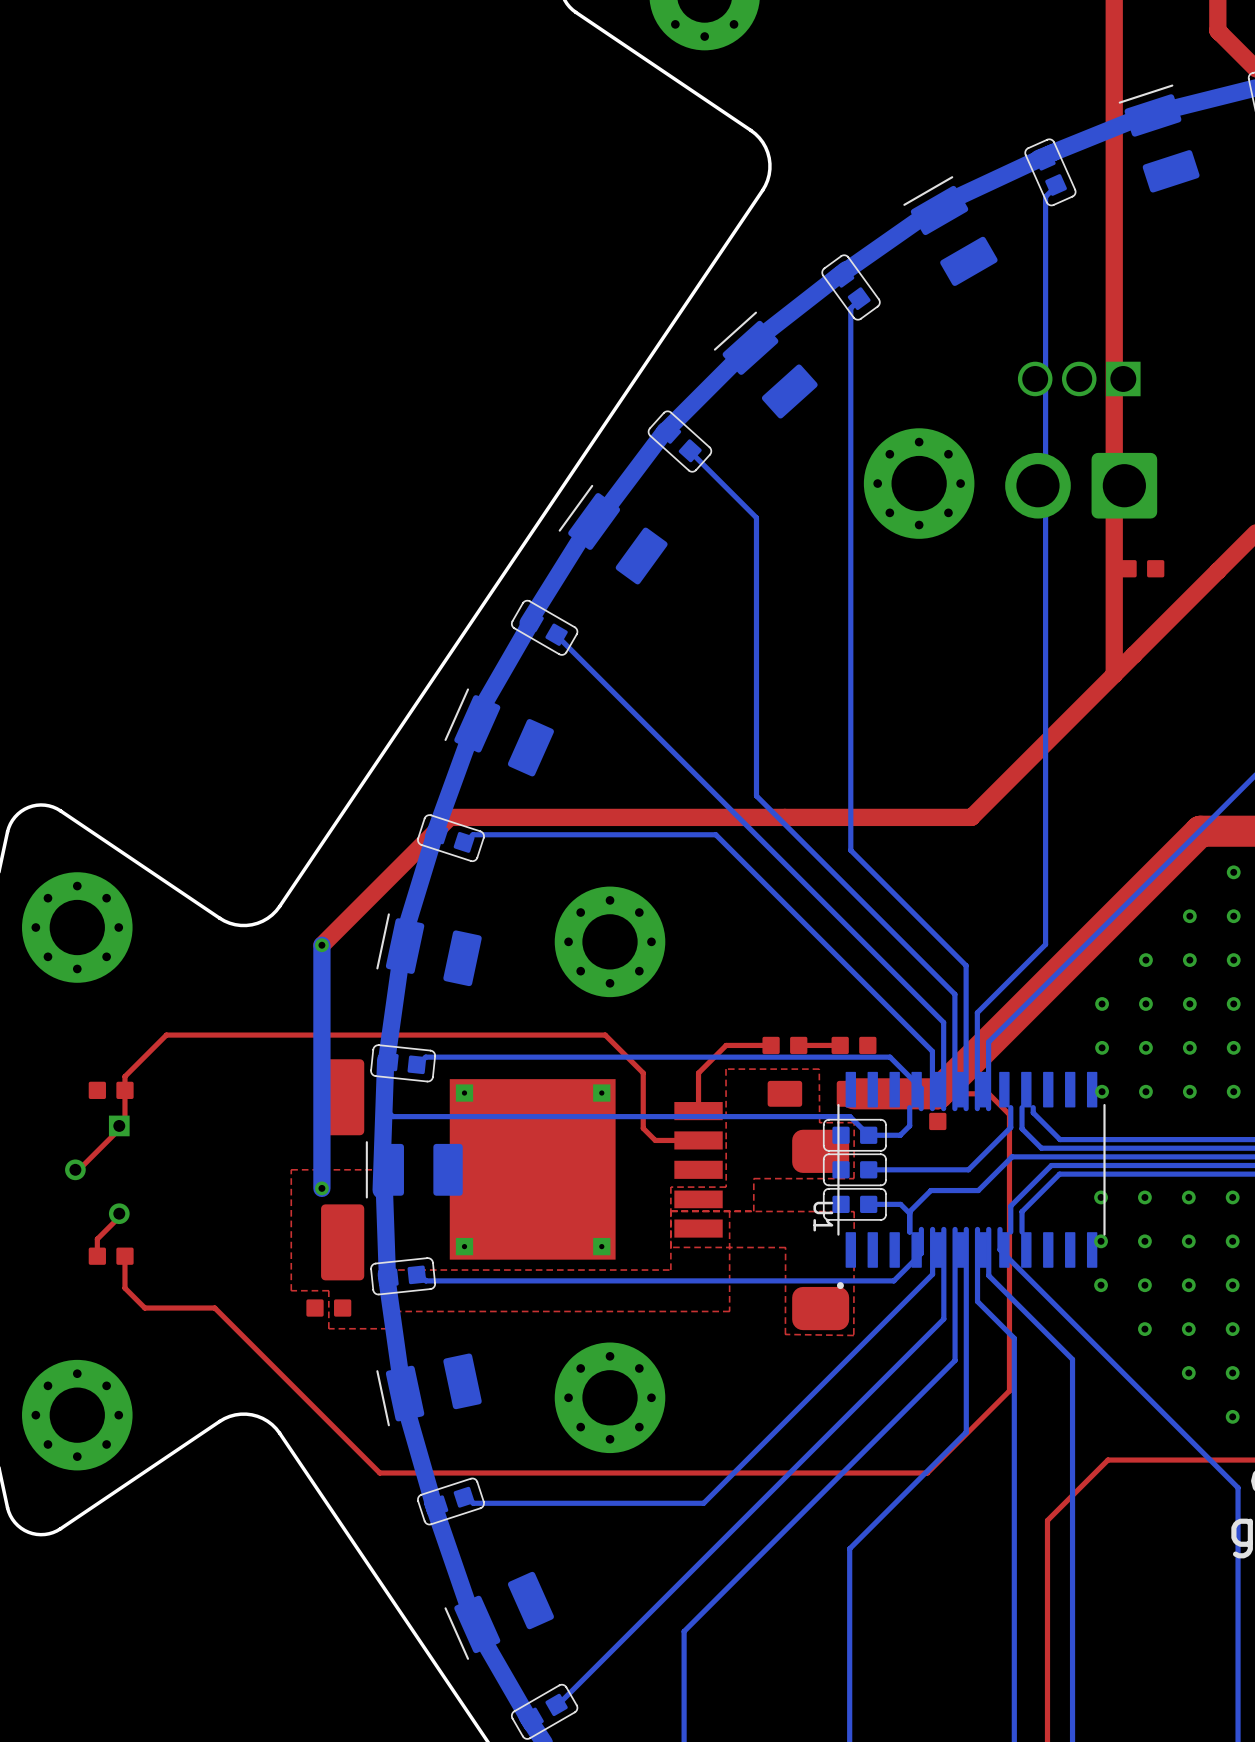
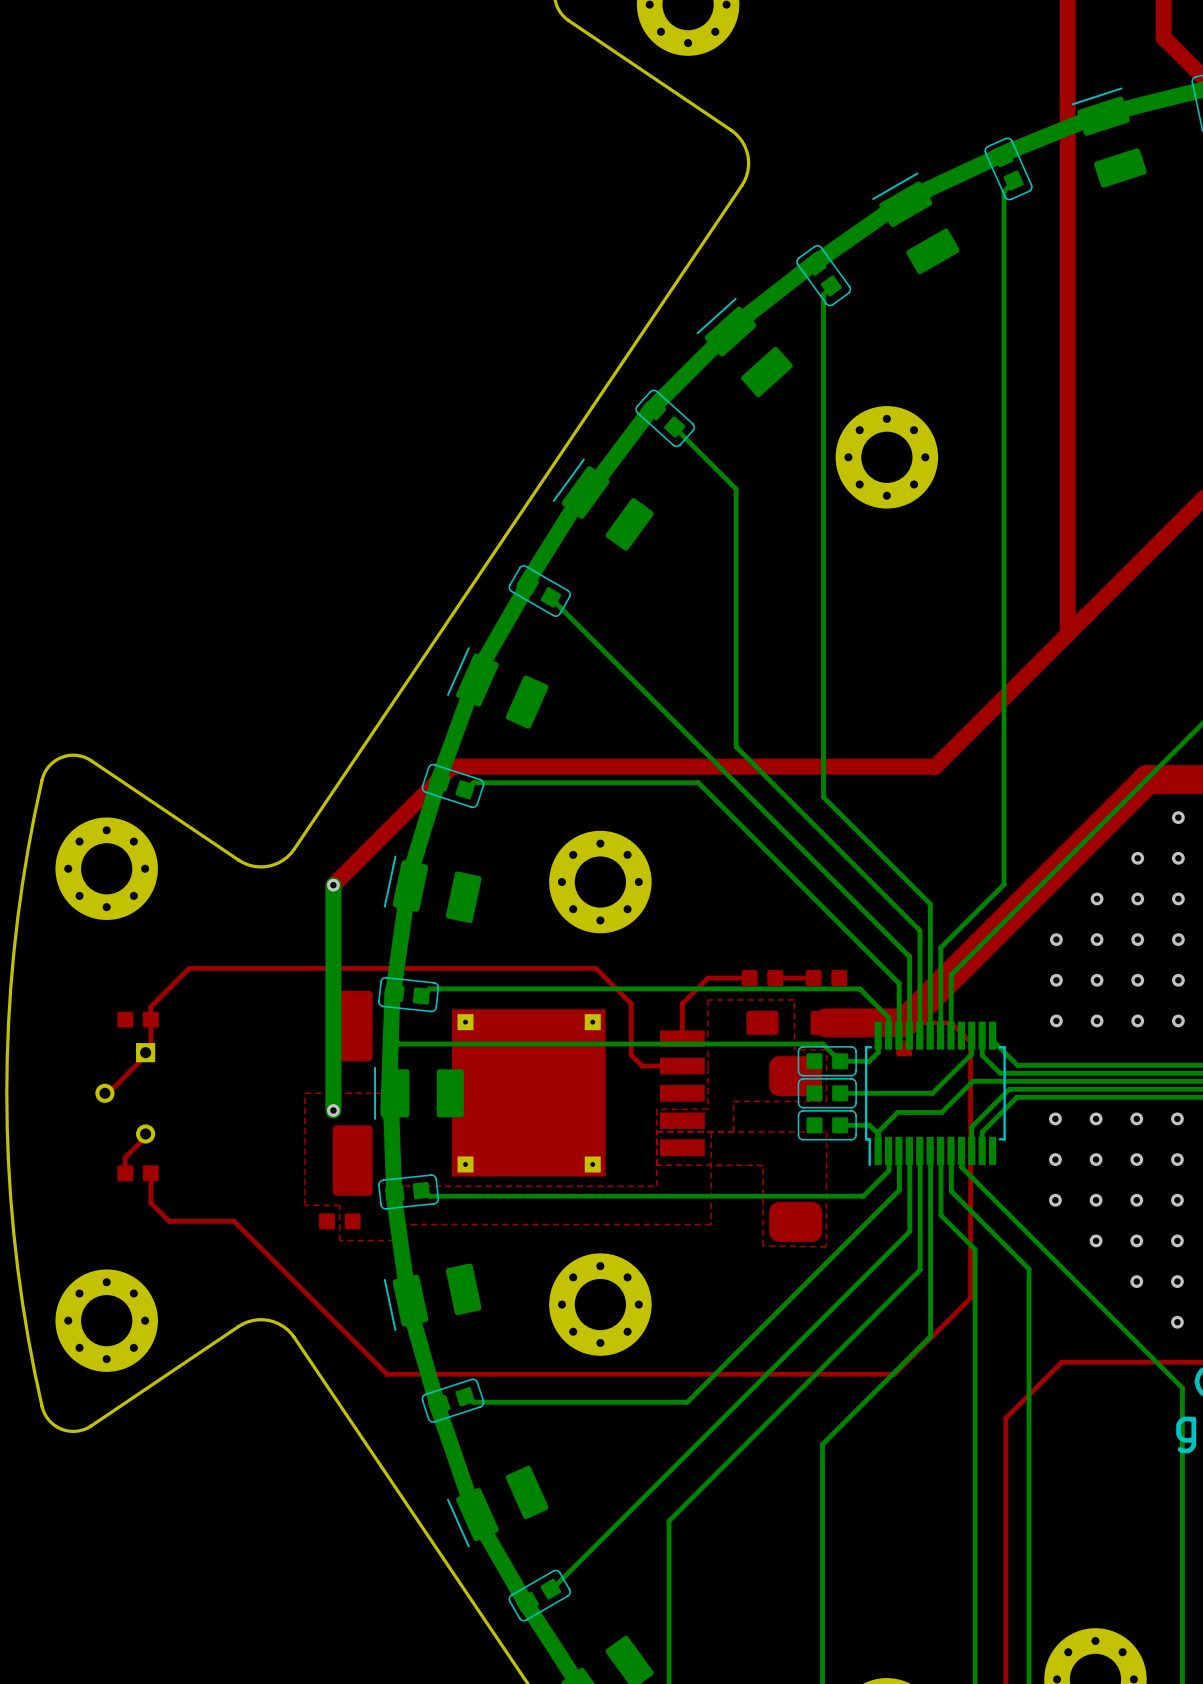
part: (1079, 378) -> none
part: (1081, 485) -> none
part: (1141, 568) -> none
part: none -> (935, 1093)
U1: (971, 1180) -> none

